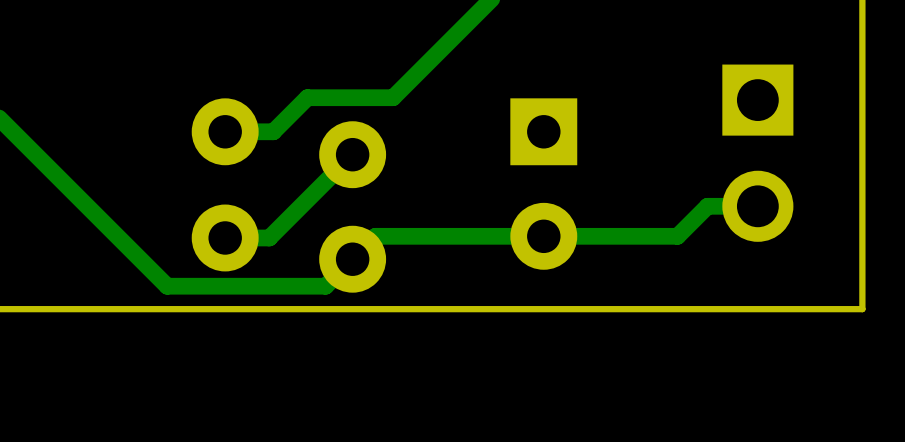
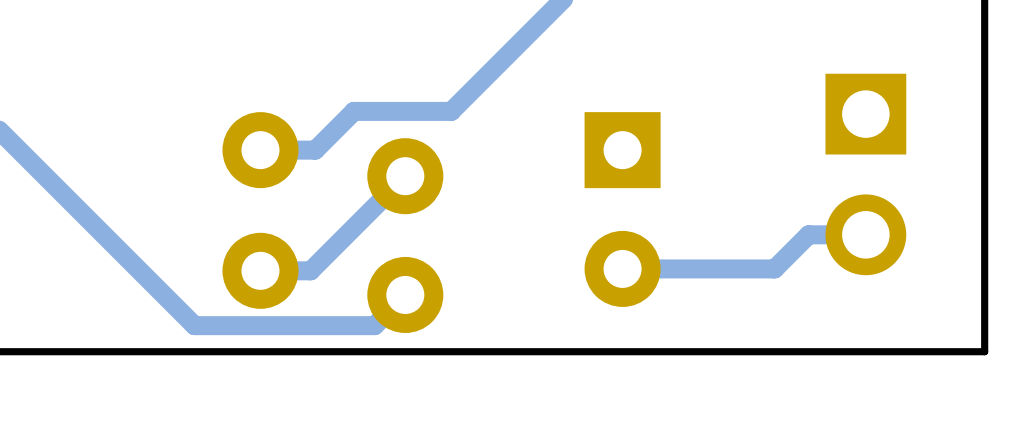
track: (543, 236) (375, 236) (352, 259) -> none

